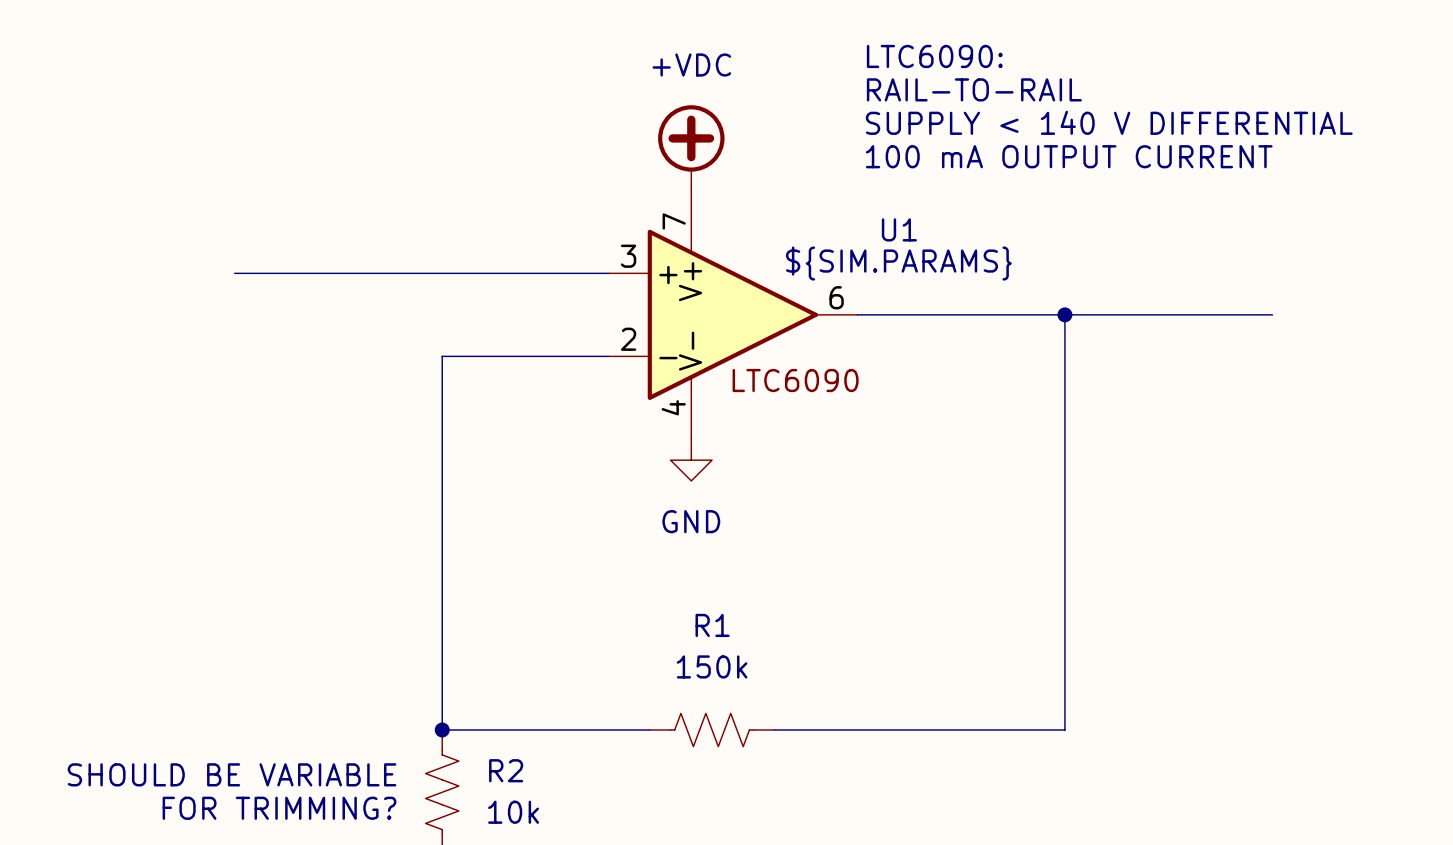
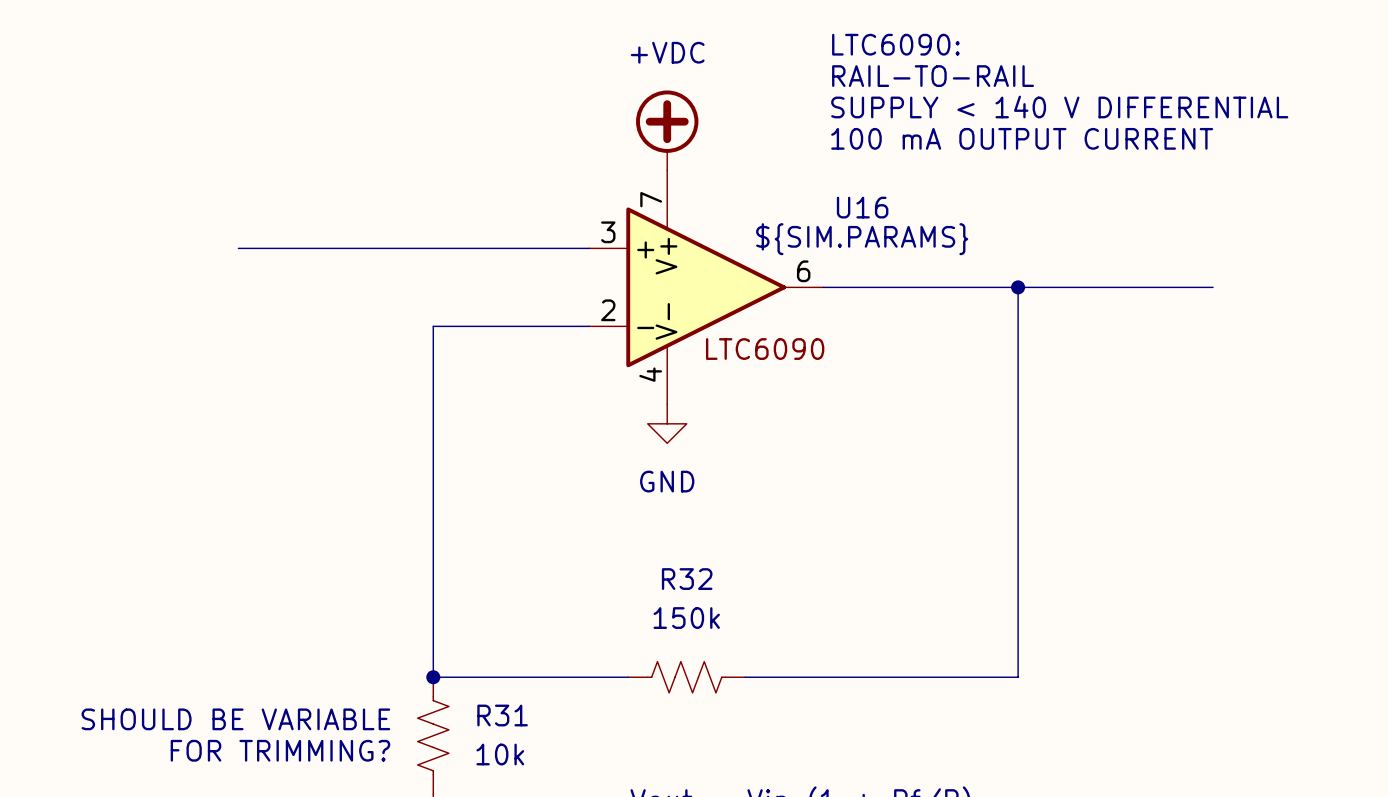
U1 name: U1 (899, 229) -> U16 (862, 207)
R1 name: R1 (712, 625) -> R32 (687, 579)
R2 name: R2 (506, 770) -> R31 (502, 715)

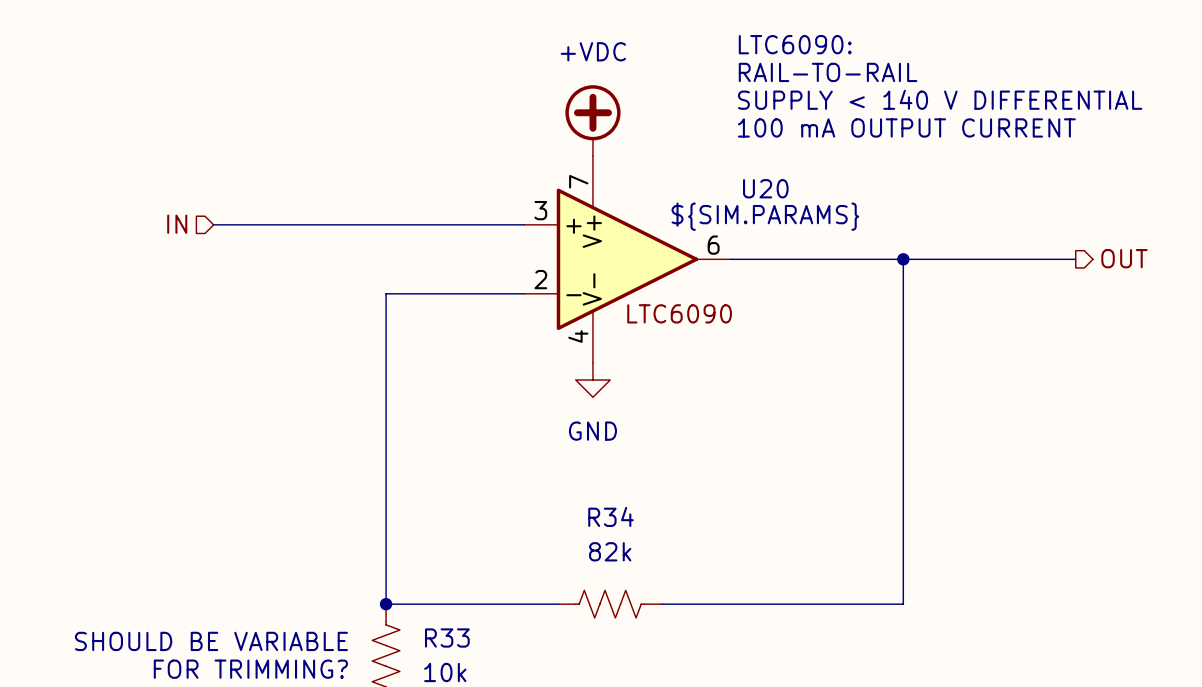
U16 name: U16 (862, 207) -> U20 (765, 188)
hierarchical label: none -> IN (177, 224)
hierarchical label: none -> OUT (1124, 258)
R32 name: R32 (687, 579) -> R34 (611, 516)
R32 value: 150k (686, 618) -> 82k (610, 551)
R31 name: R31 (502, 715) -> R33 (447, 638)

